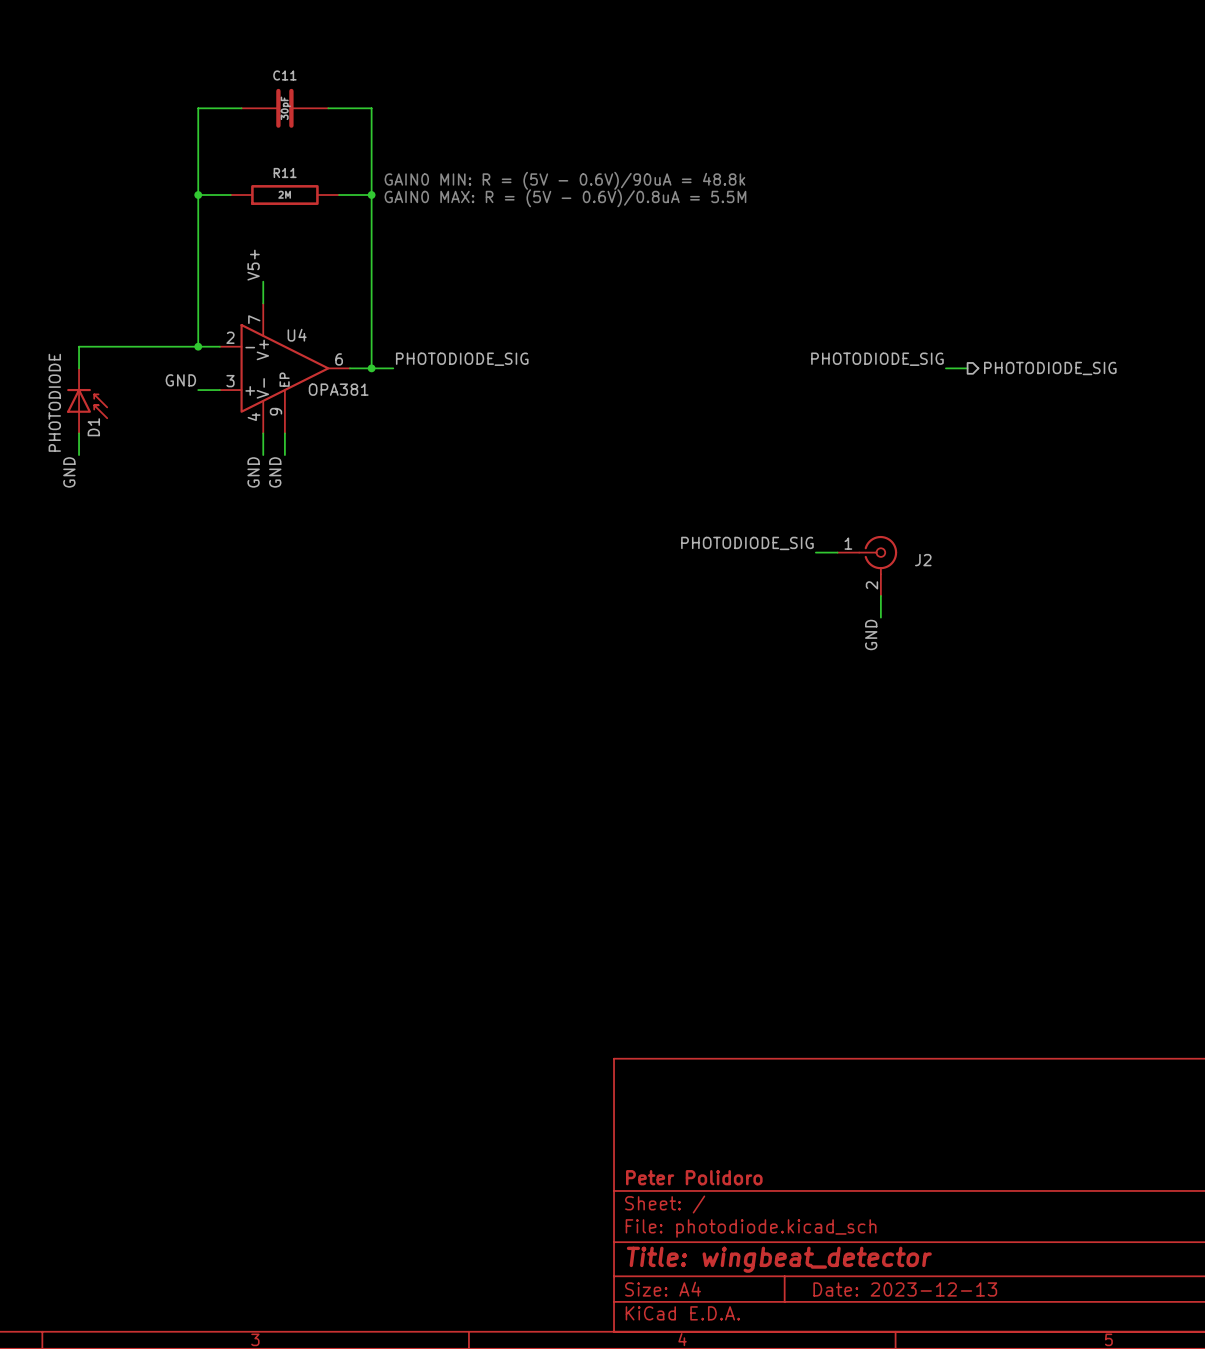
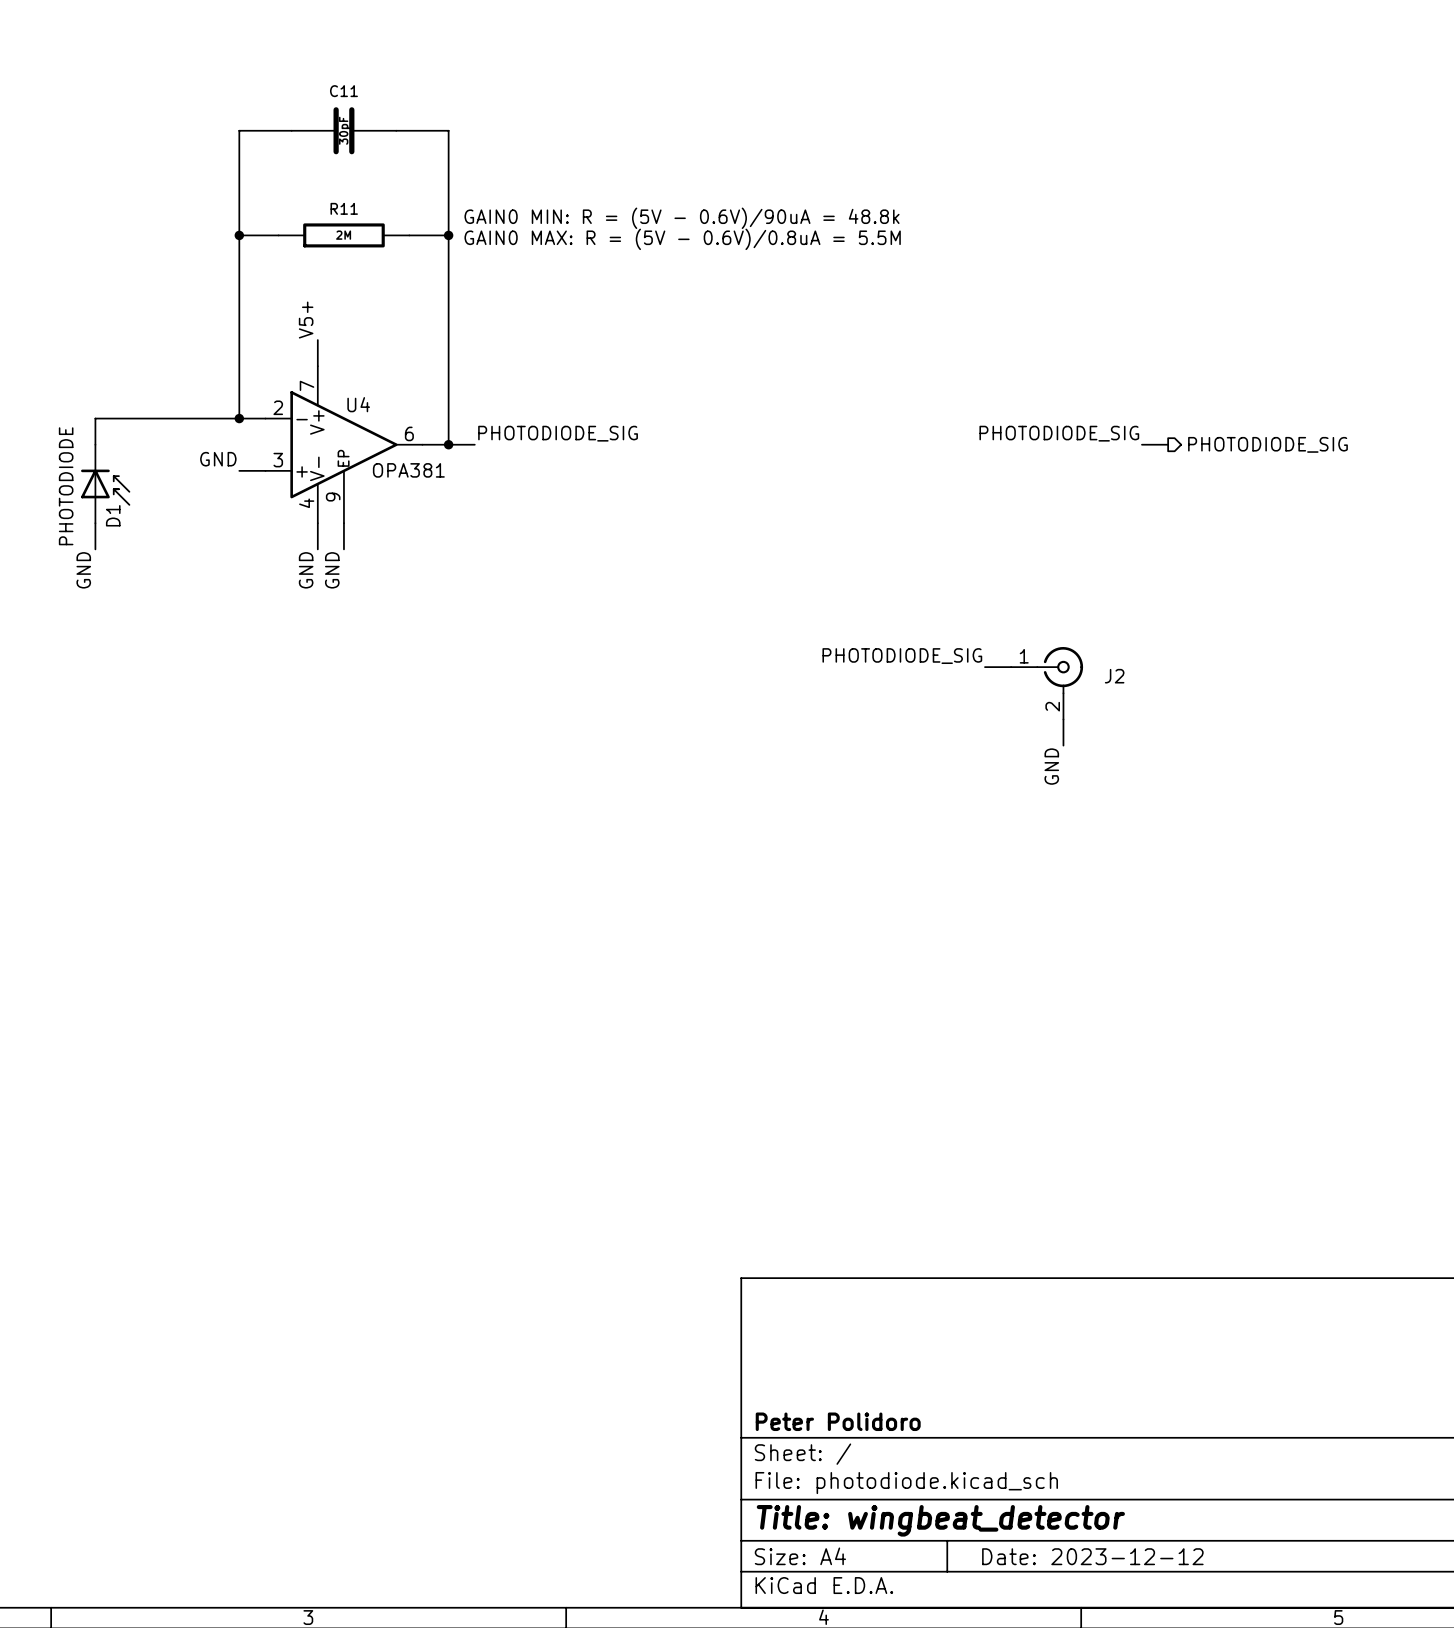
title block: Date: 2023-12-13 (905, 1289) -> Date: 2023-12-12 (1092, 1556)

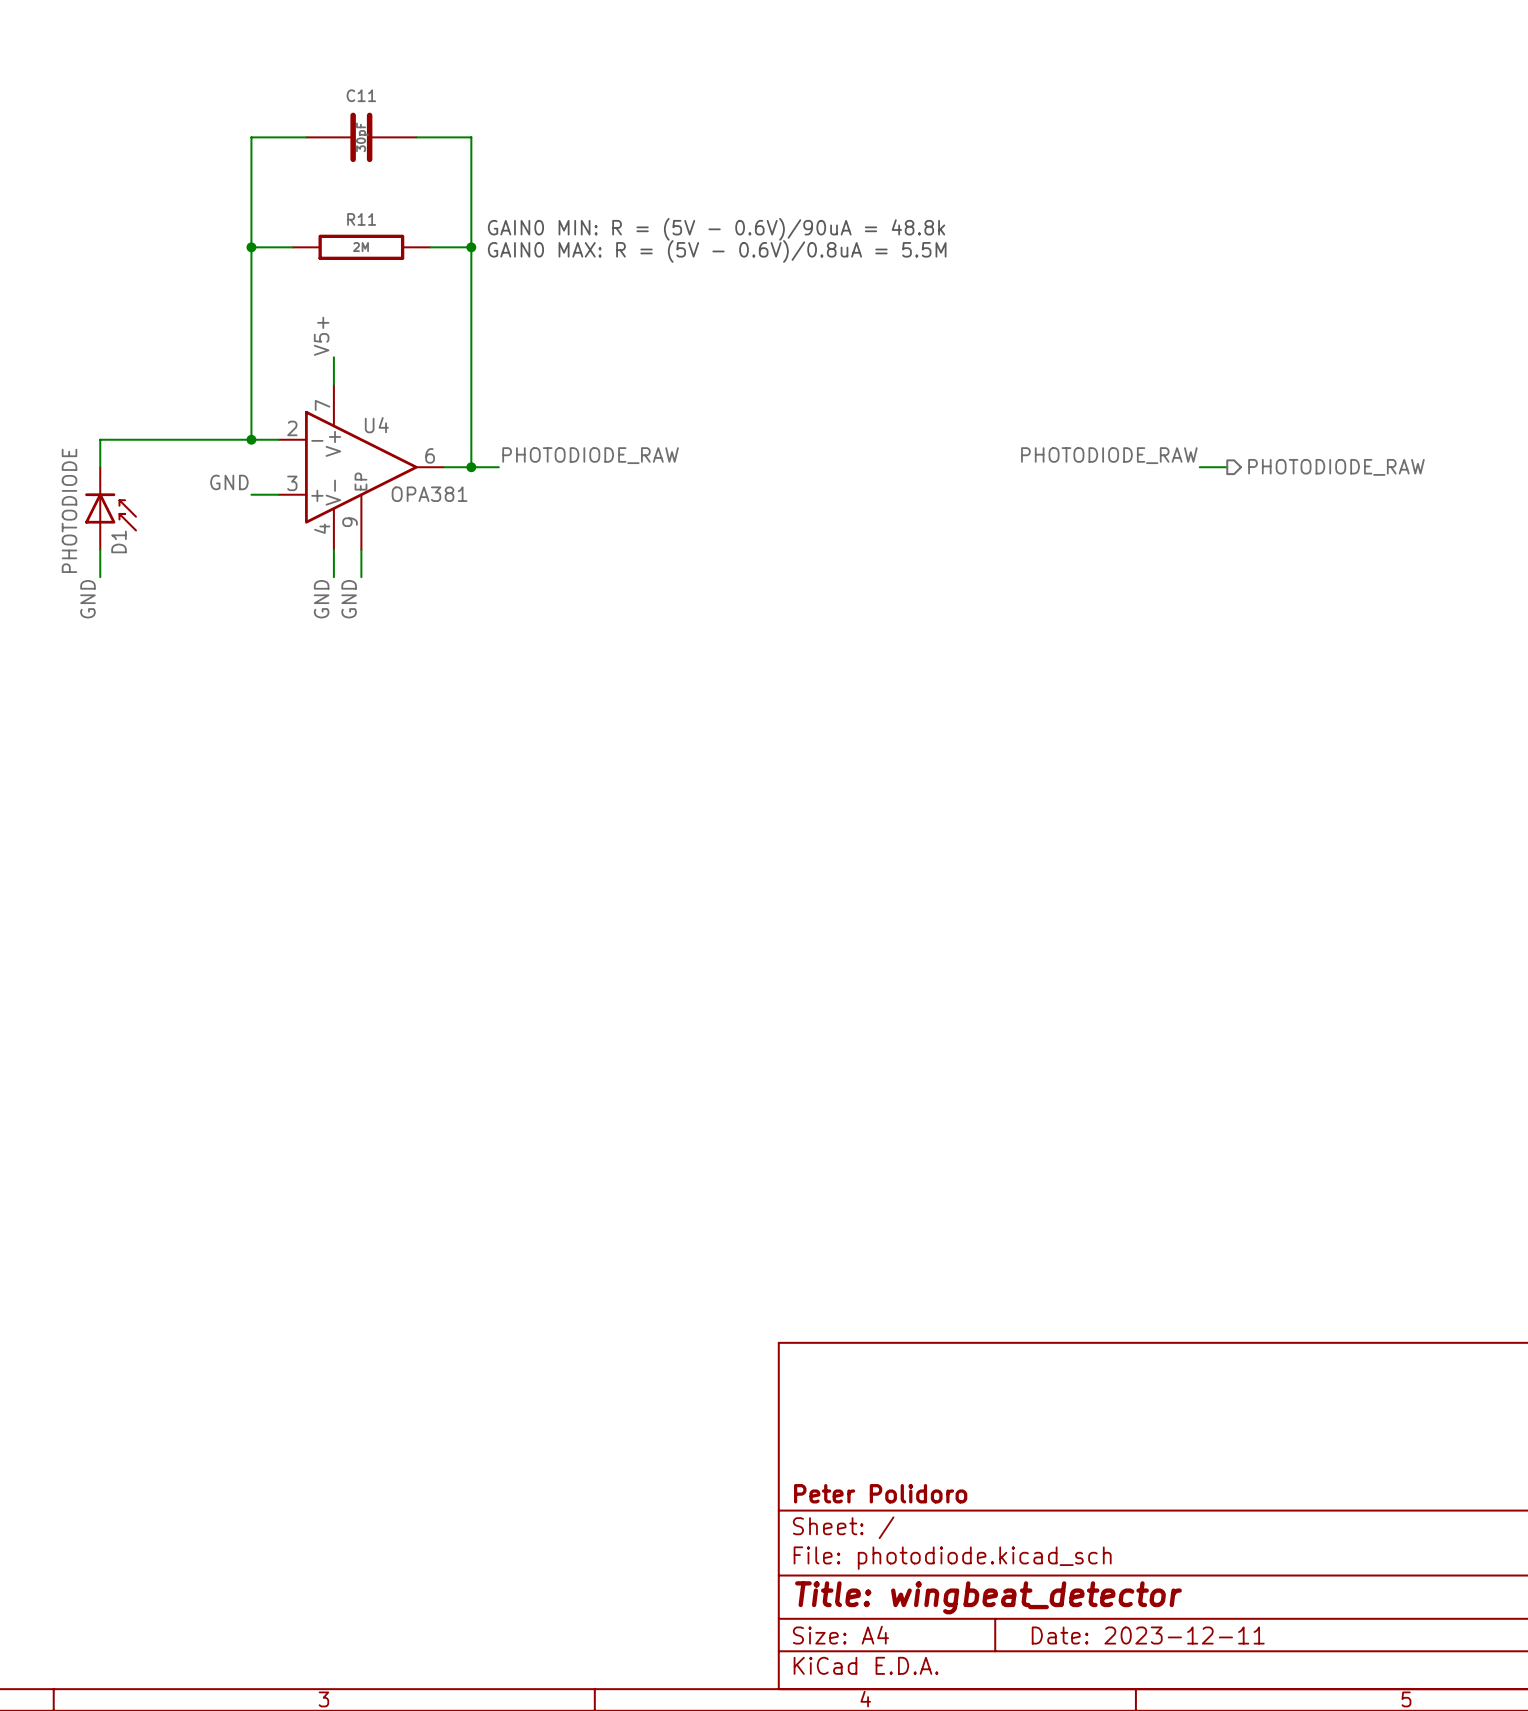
label: PHOTODIODE_SIG (558, 433) -> PHOTODIODE_RAW (590, 455)
label: PHOTODIODE_SIG (1059, 433) -> PHOTODIODE_RAW (1109, 455)
hierarchical label: PHOTODIODE_SIG (1267, 444) -> PHOTODIODE_RAW (1336, 467)
label: PHOTODIODE_SIG (902, 656) -> none
wire: (984, 667) (1011, 667) -> none
J2: (1047, 683) -> none
wire: (1063, 719) (1063, 745) -> none
label: GND (1051, 766) -> none
title block: Date: 2023-12-12 (1092, 1556) -> Date: 2023-12-11 (1148, 1635)

